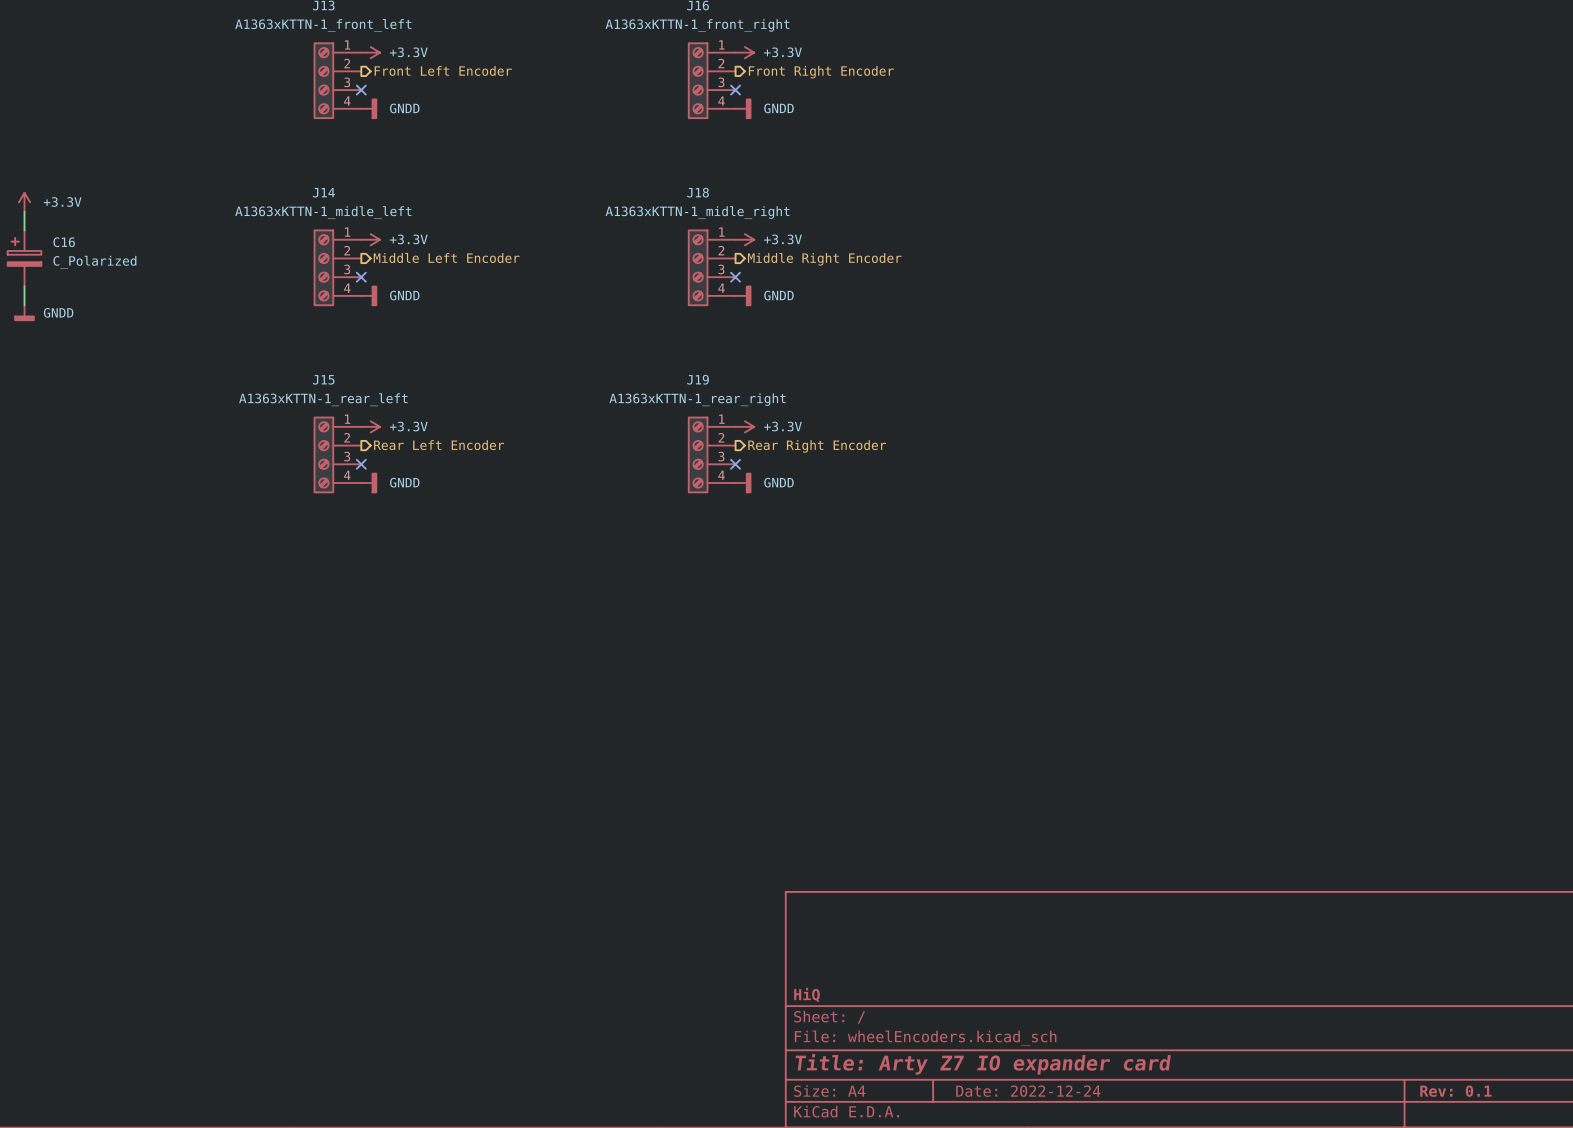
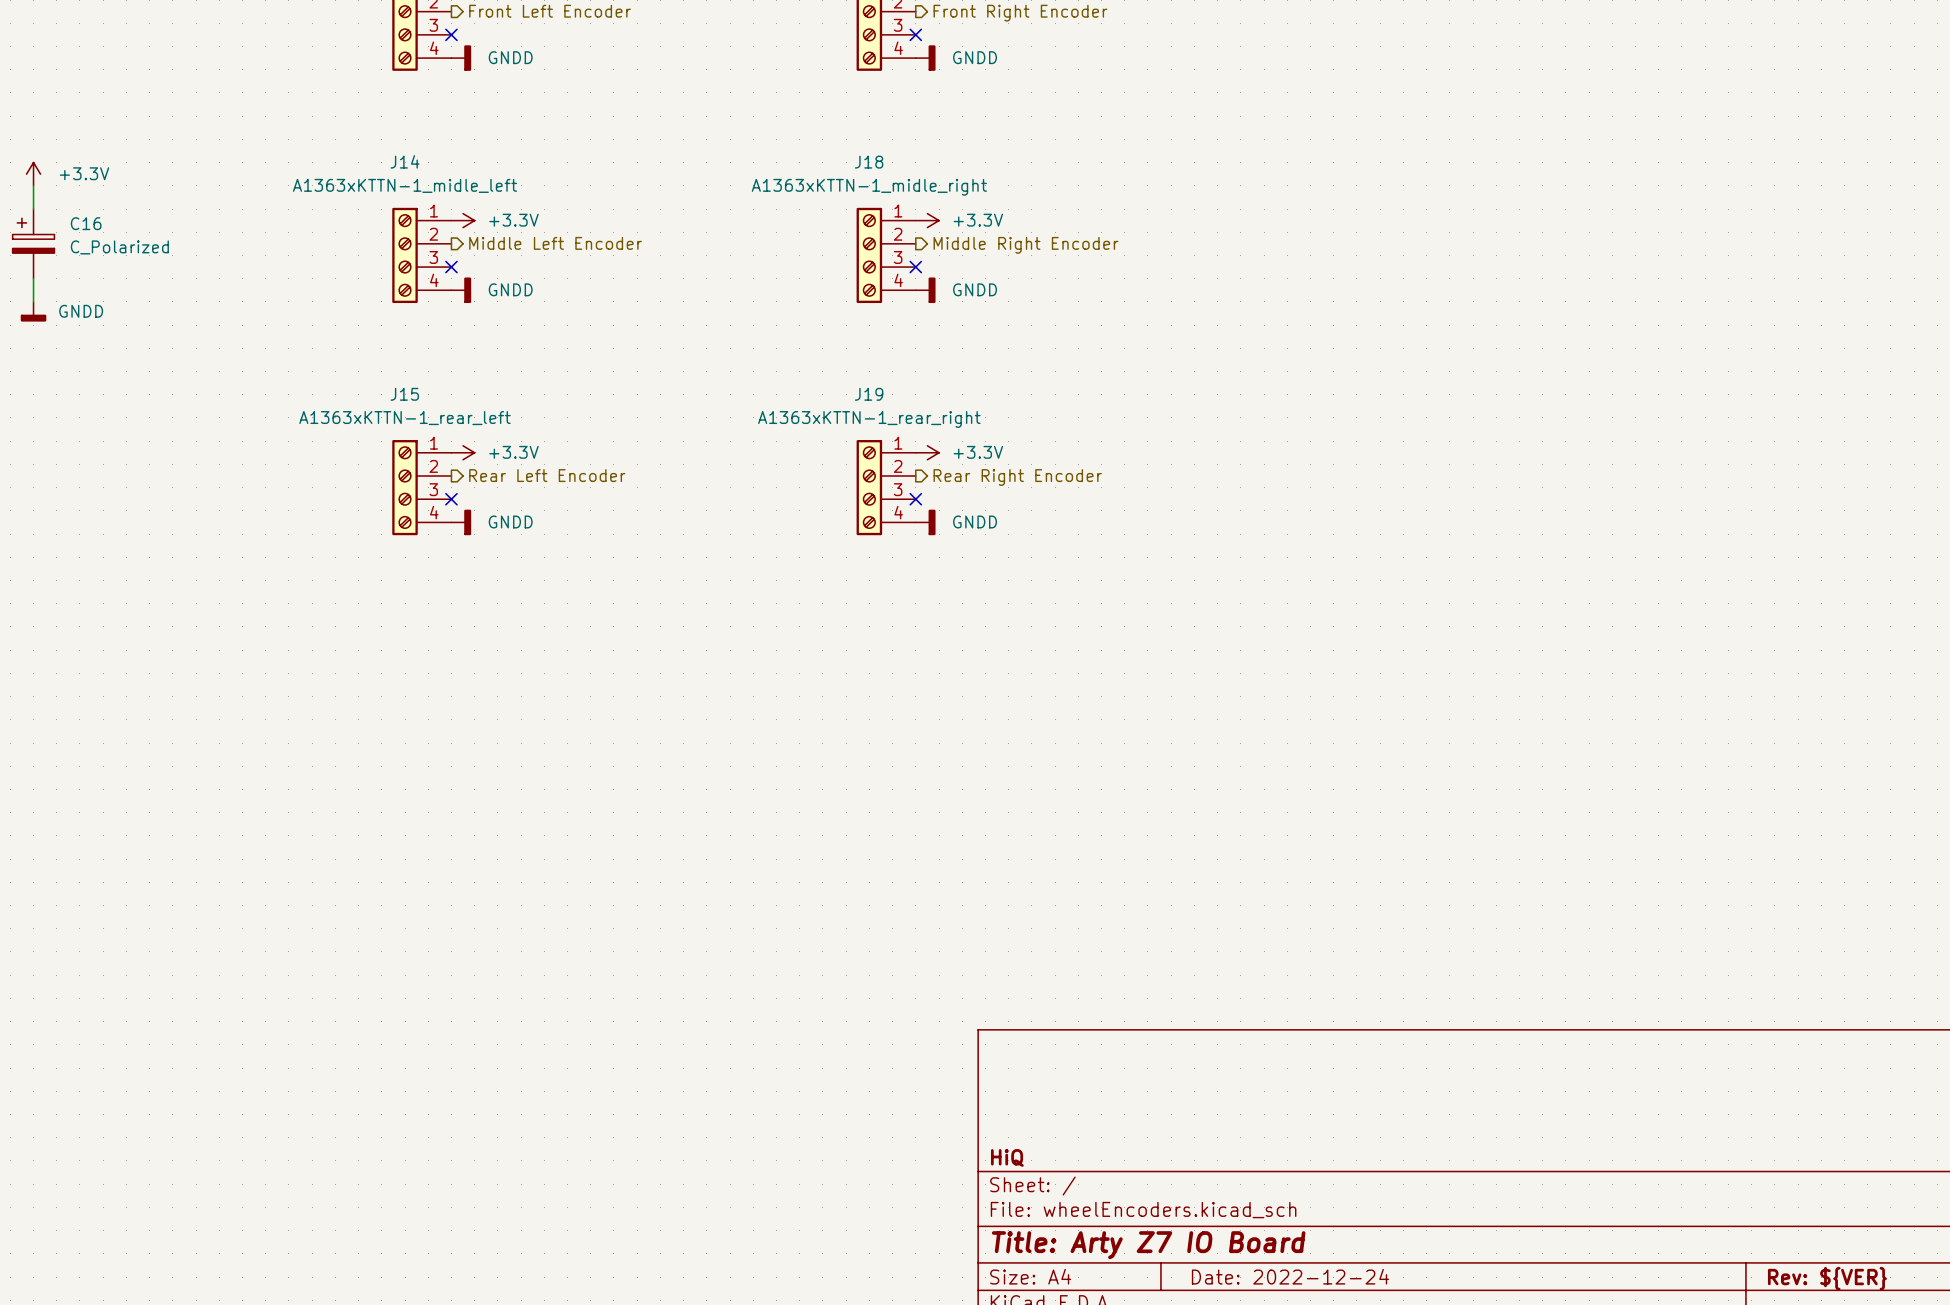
title block: Title: Arty Z7 IO expander card (983, 1064) -> Title: Arty Z7 IO Board (1148, 1245)
title block: Rev: 0.1 (1455, 1091) -> Rev: ${VER} (1827, 1278)

